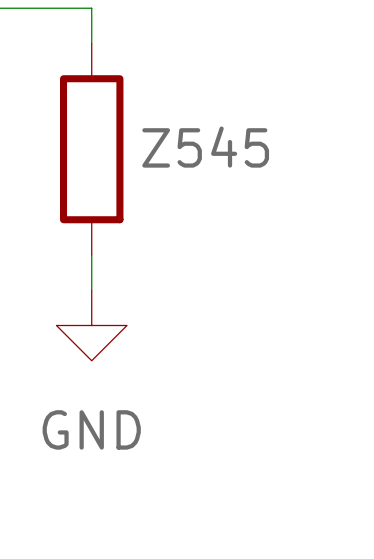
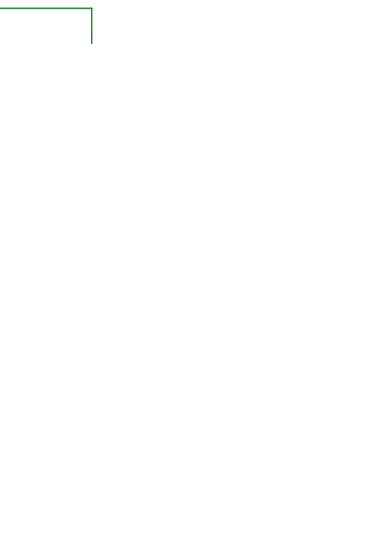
Z545: (91, 149) -> none
wire: (91, 254) (91, 290) -> none
power symbol: GND (91, 325) -> none

